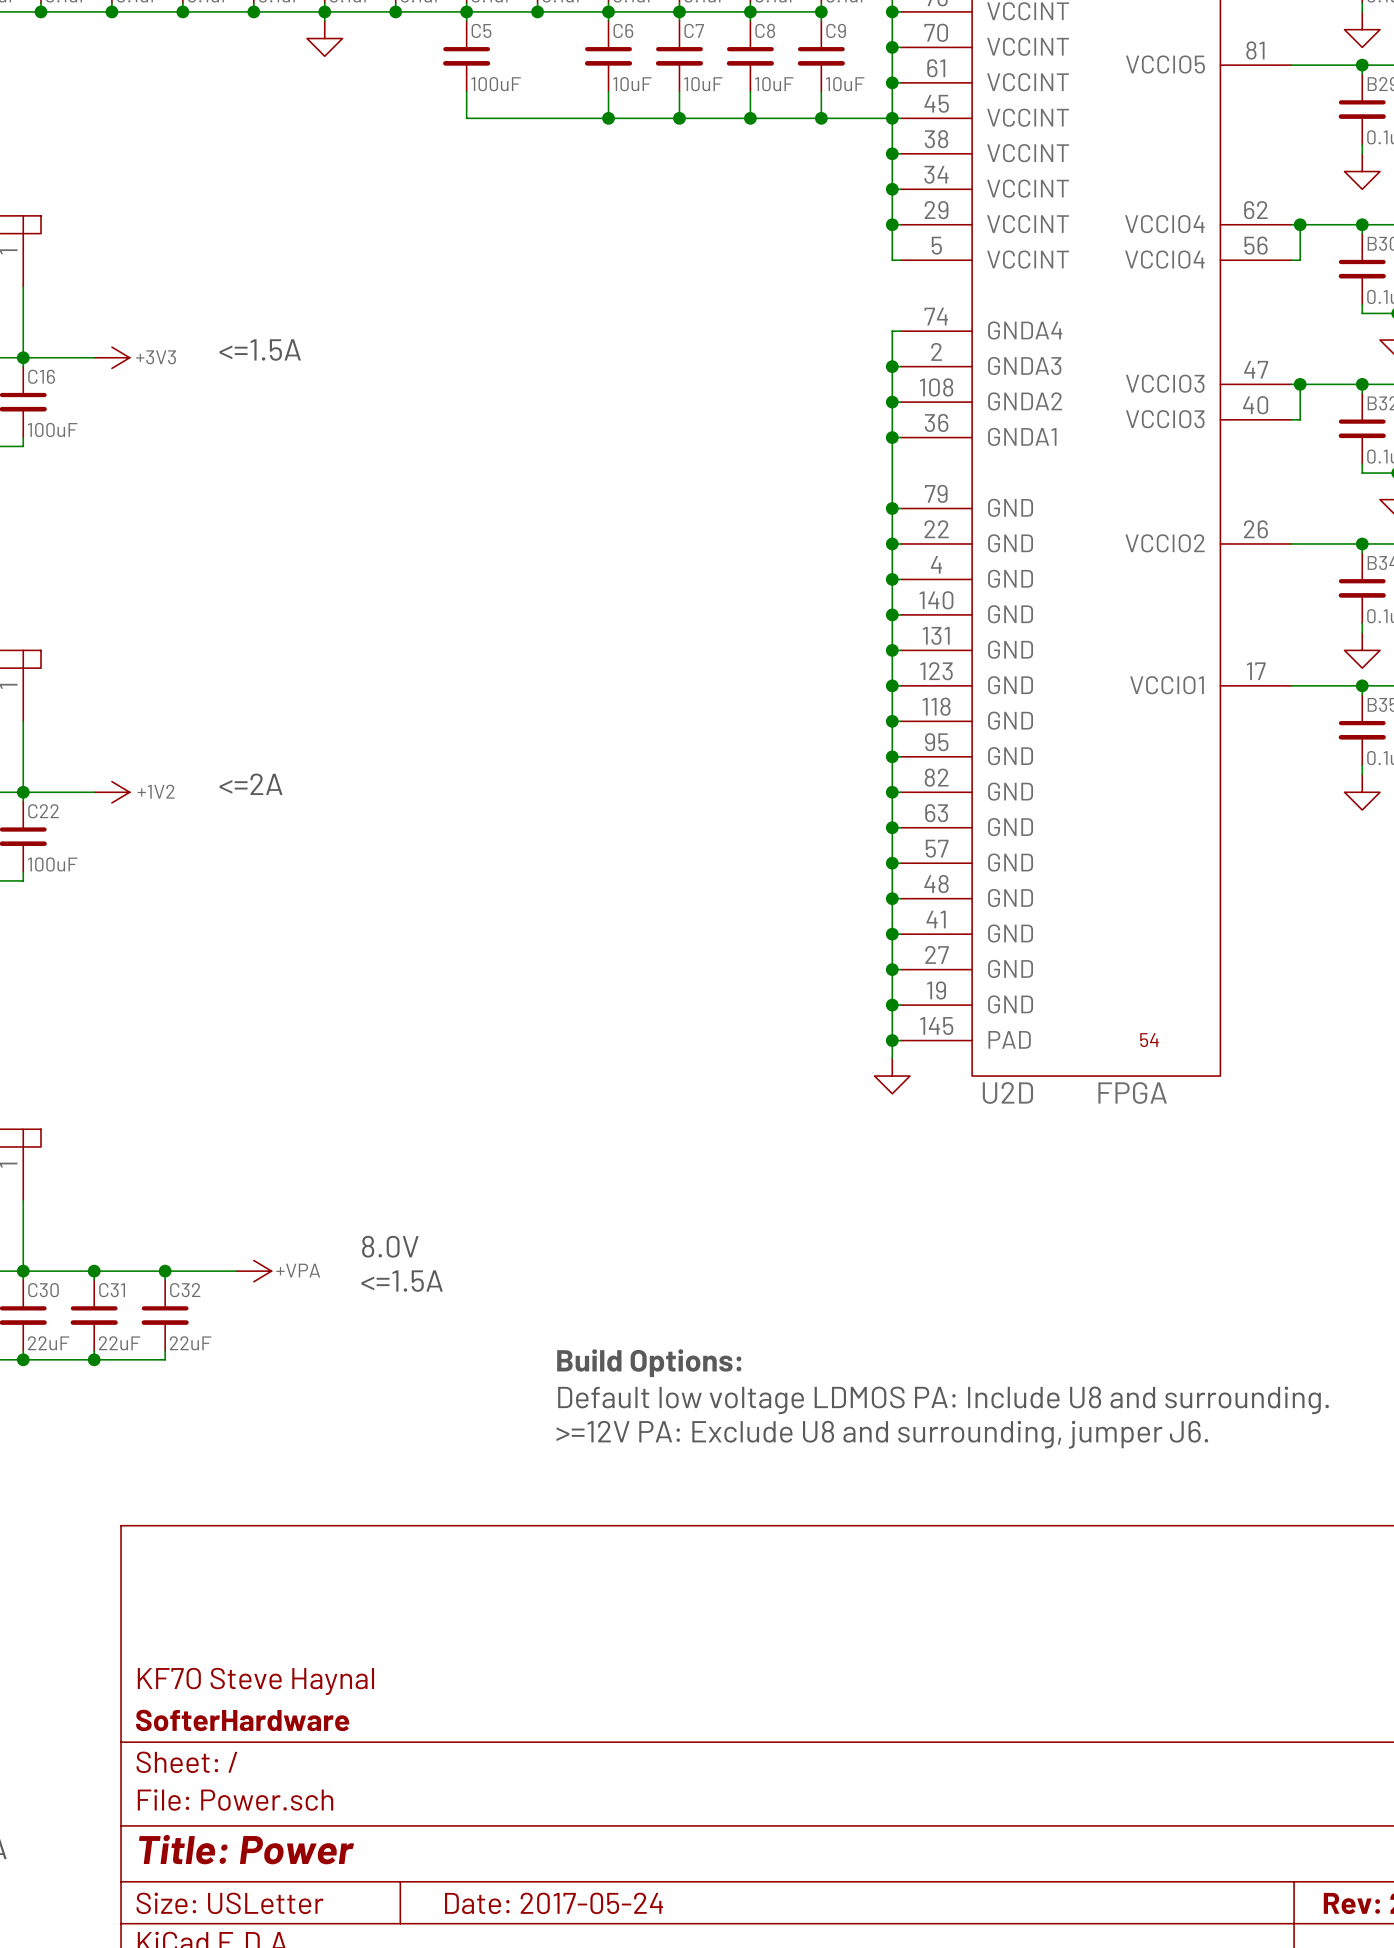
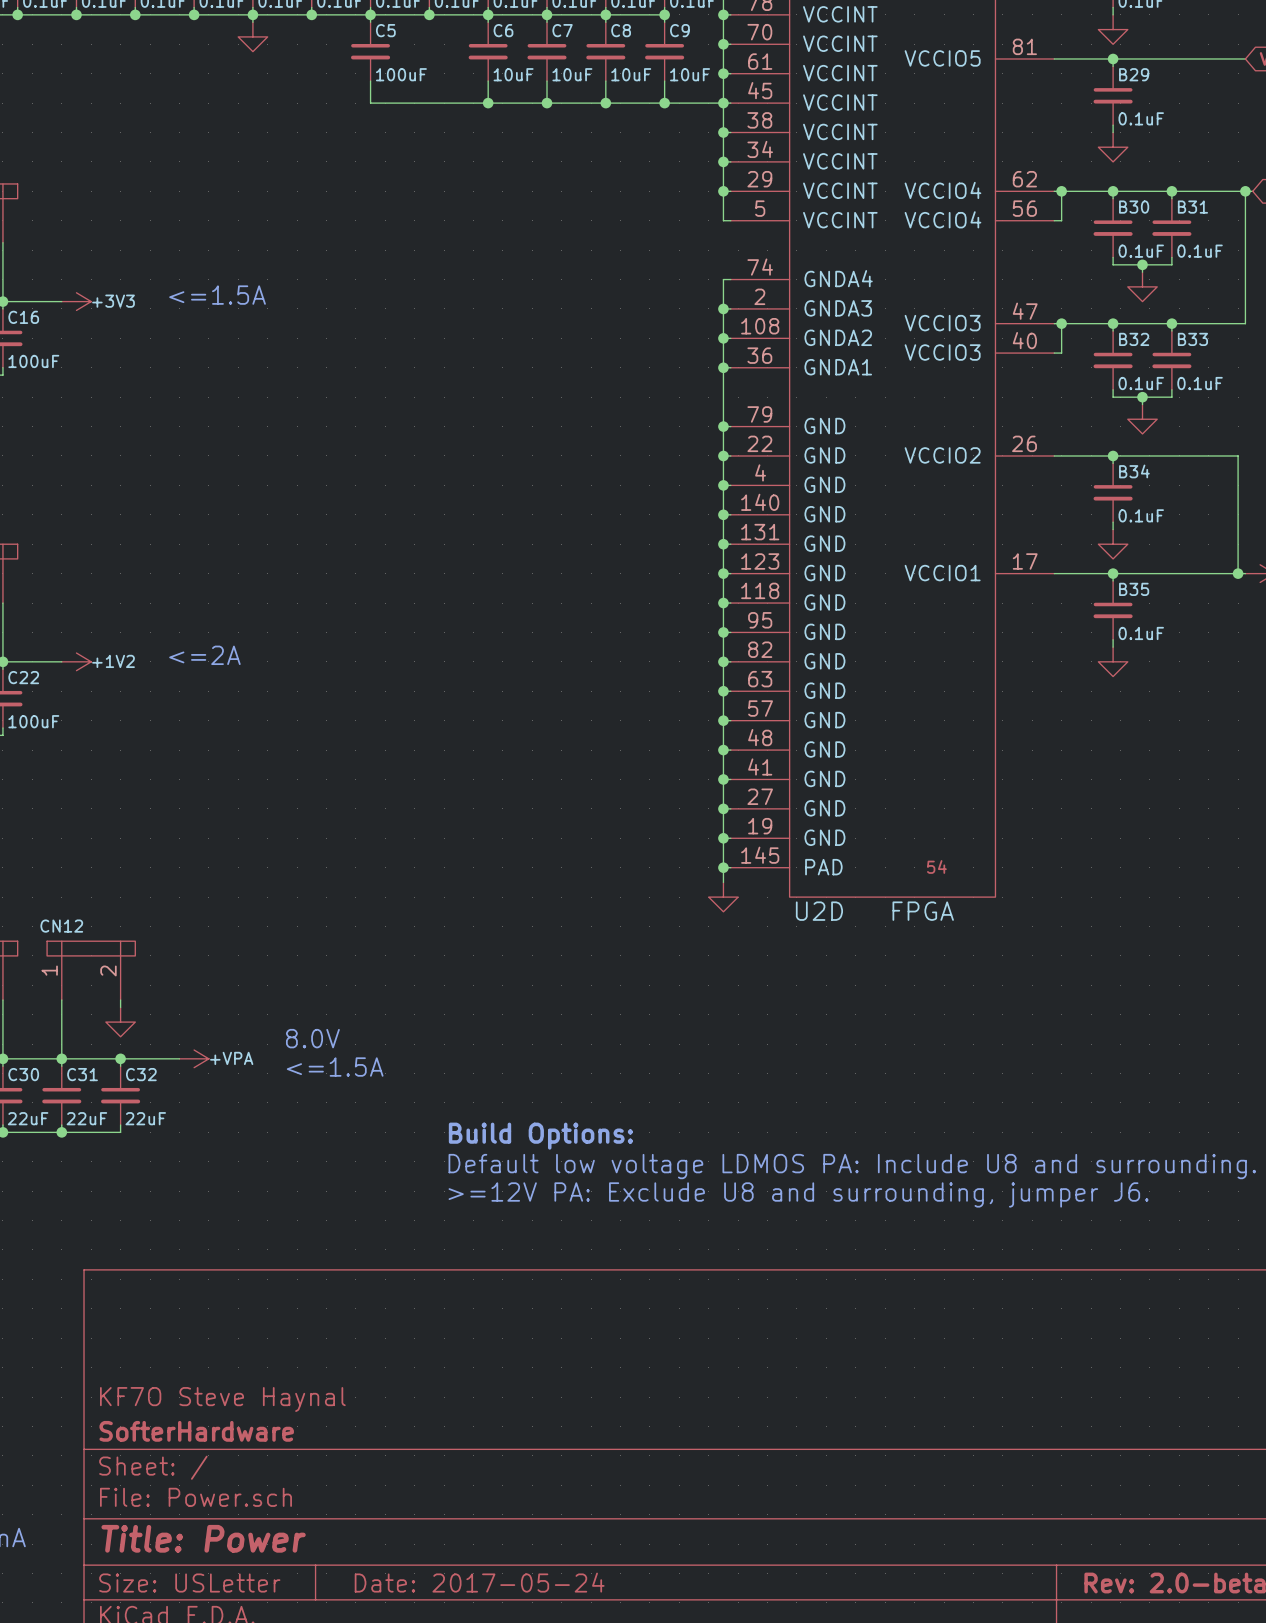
CN12: none -> (91, 970)
wire: none -> (61, 1000) (61, 1058)
wire: none -> (120, 1000) (120, 1007)
power symbol: none -> (120, 1022)

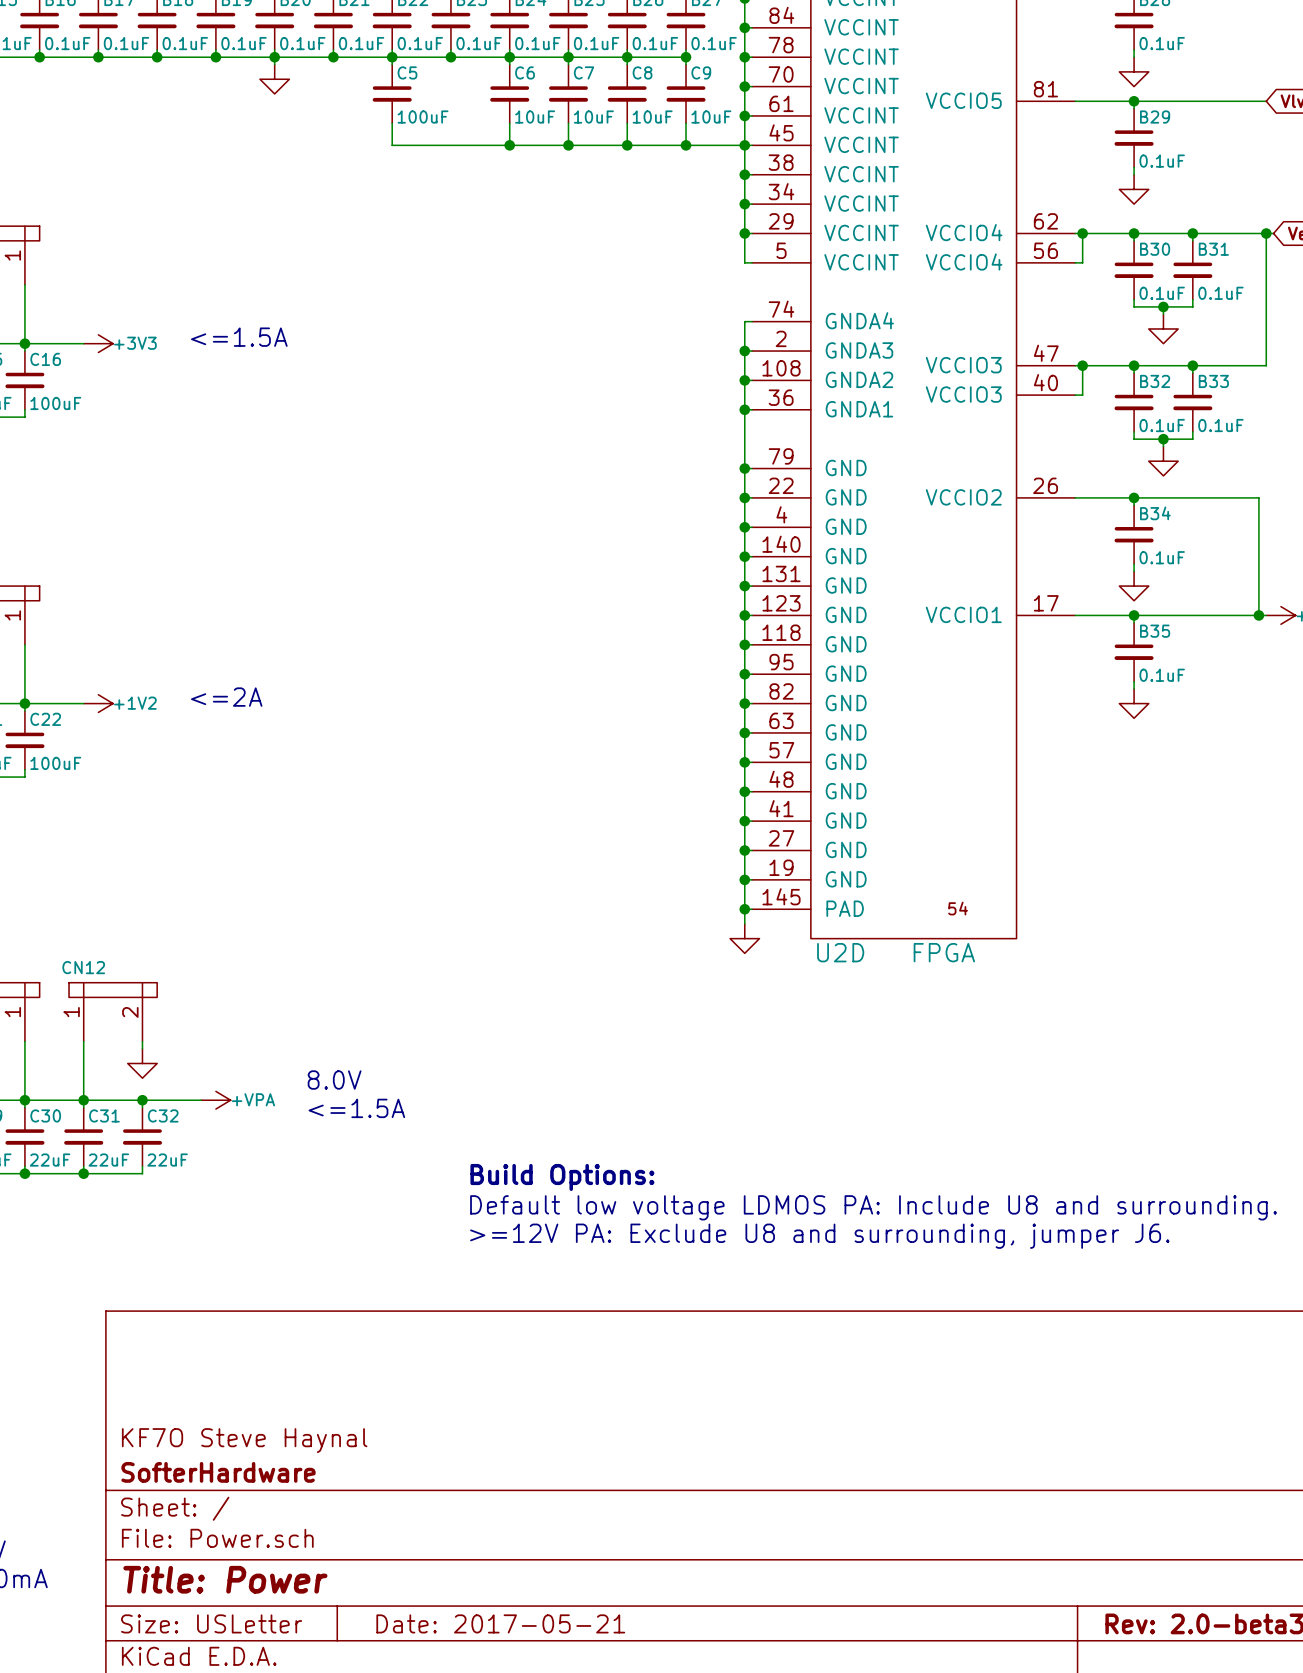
title block: Date: 2017-05-24 (479, 1582) -> Date: 2017-05-21 (500, 1623)

